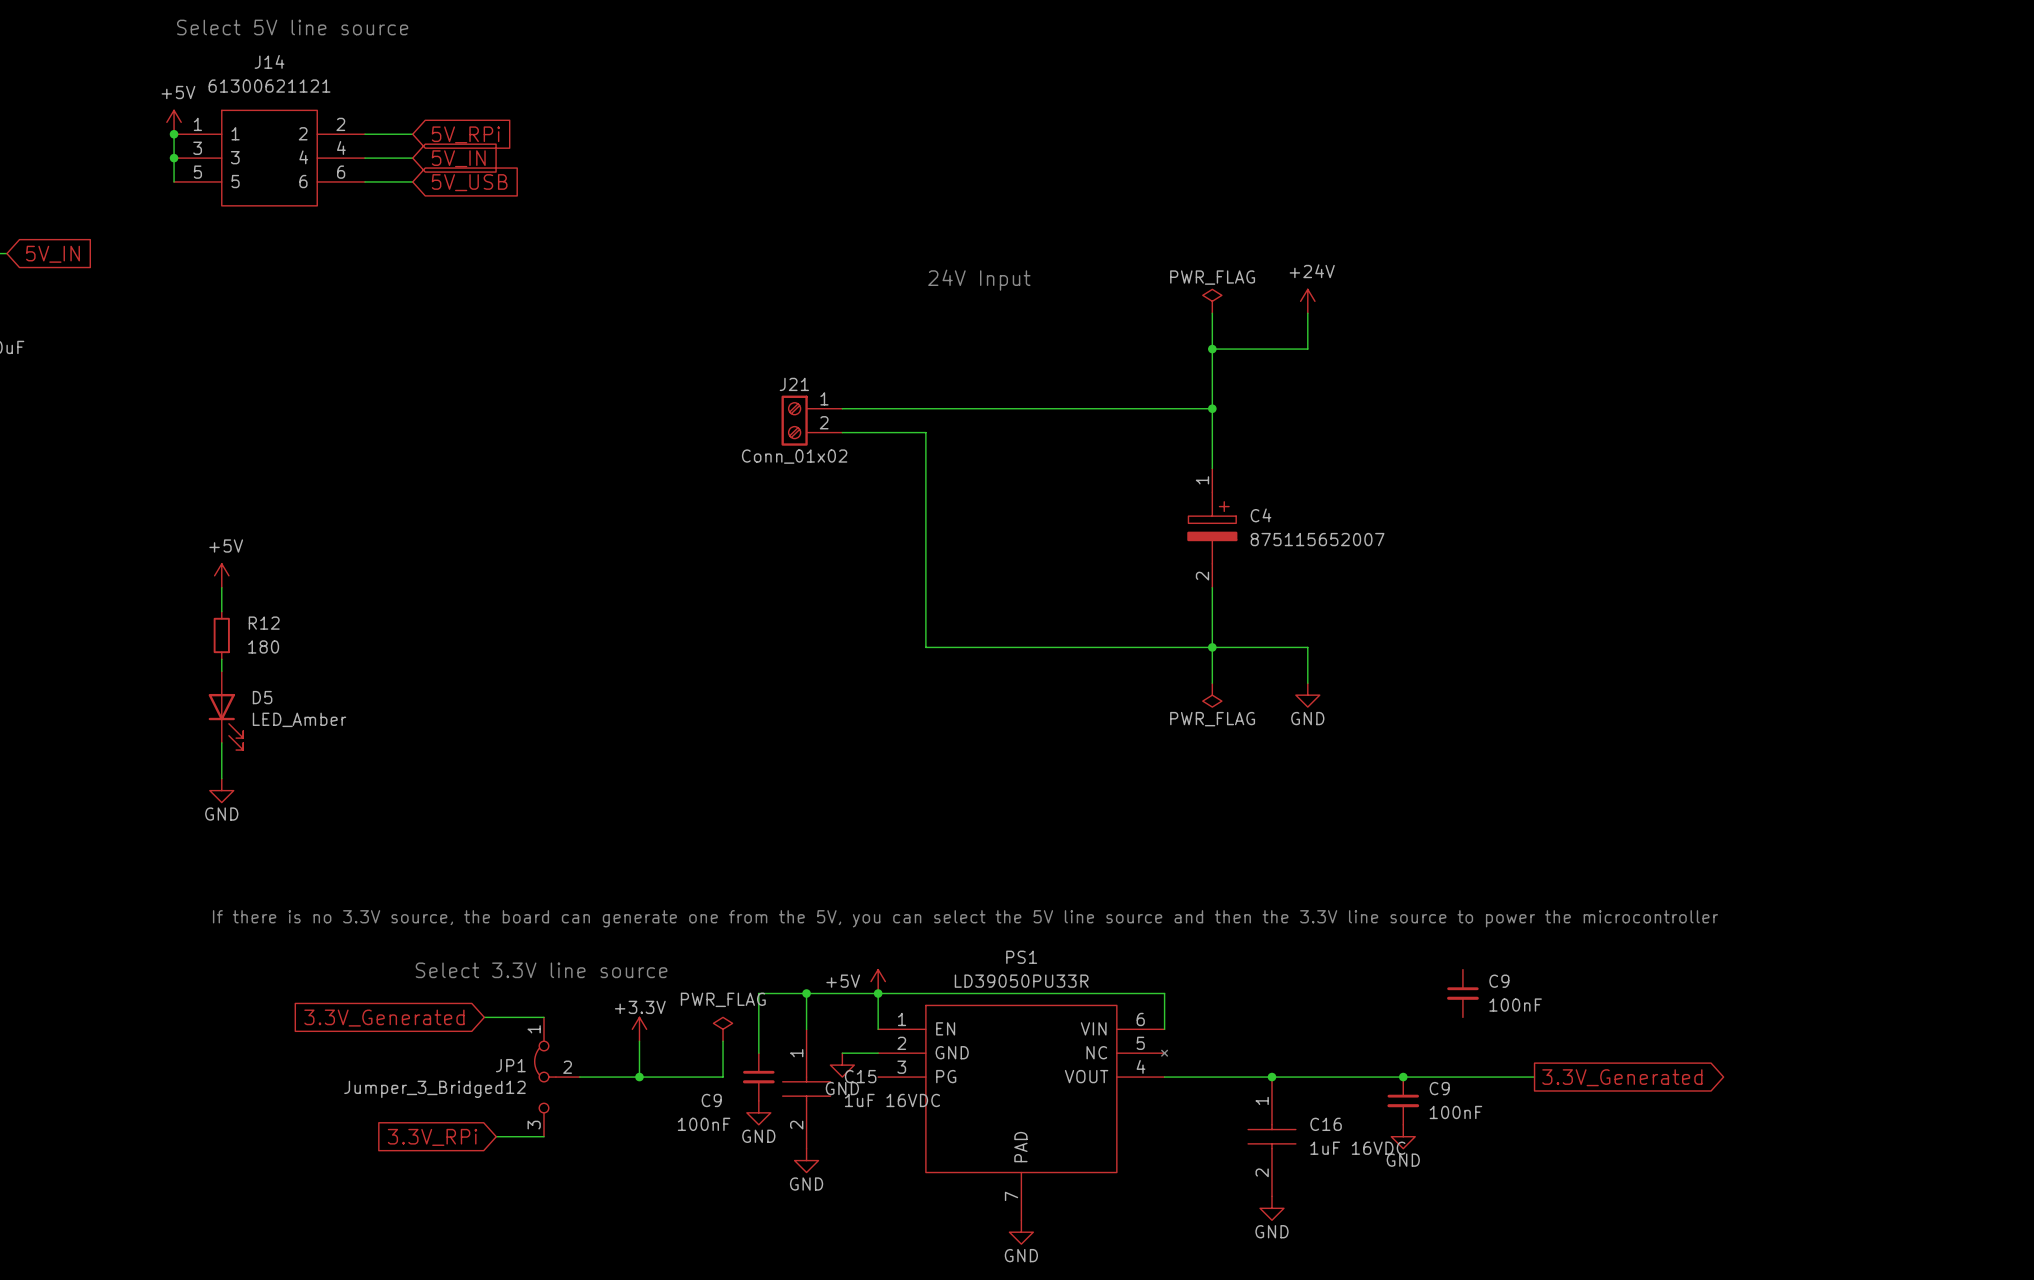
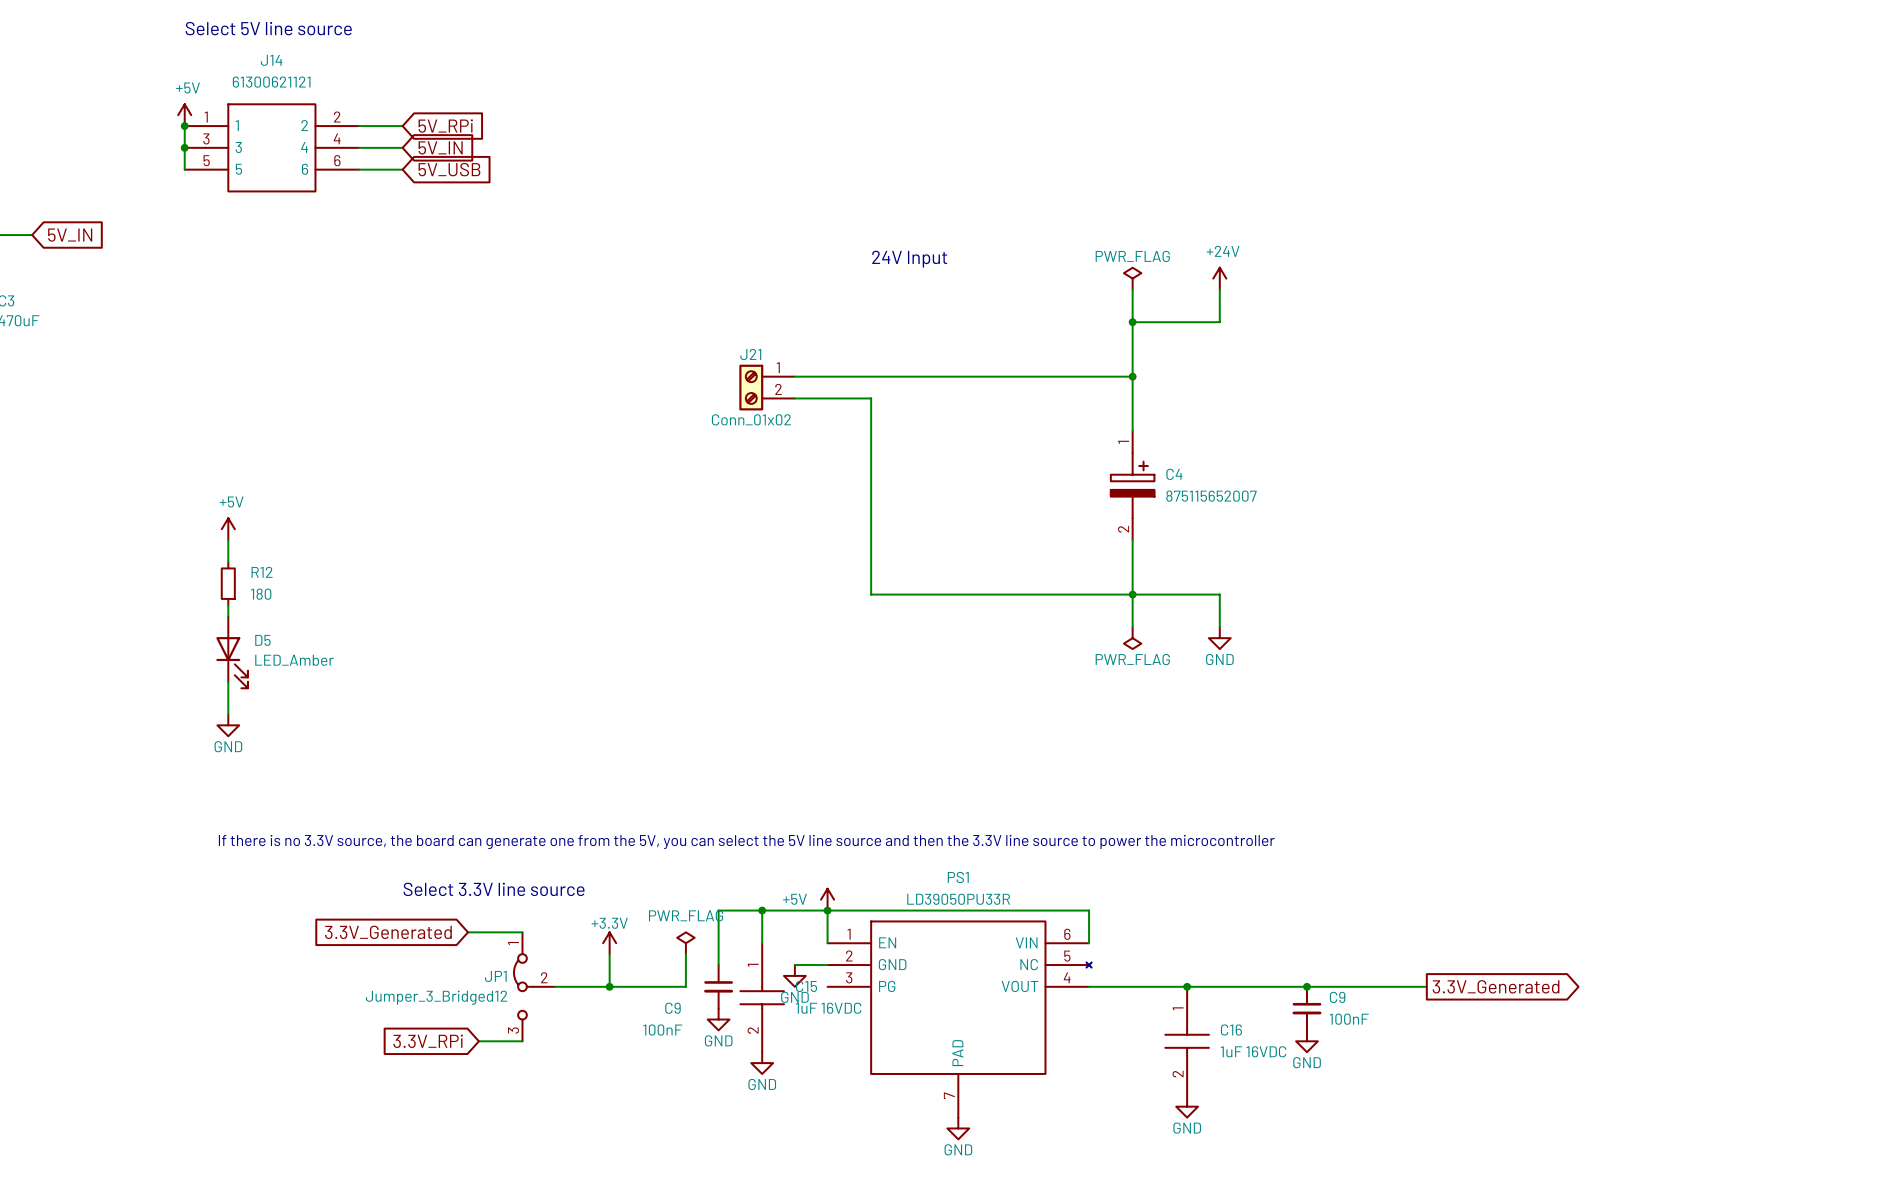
C9: 100nF (1462, 993) -> none

